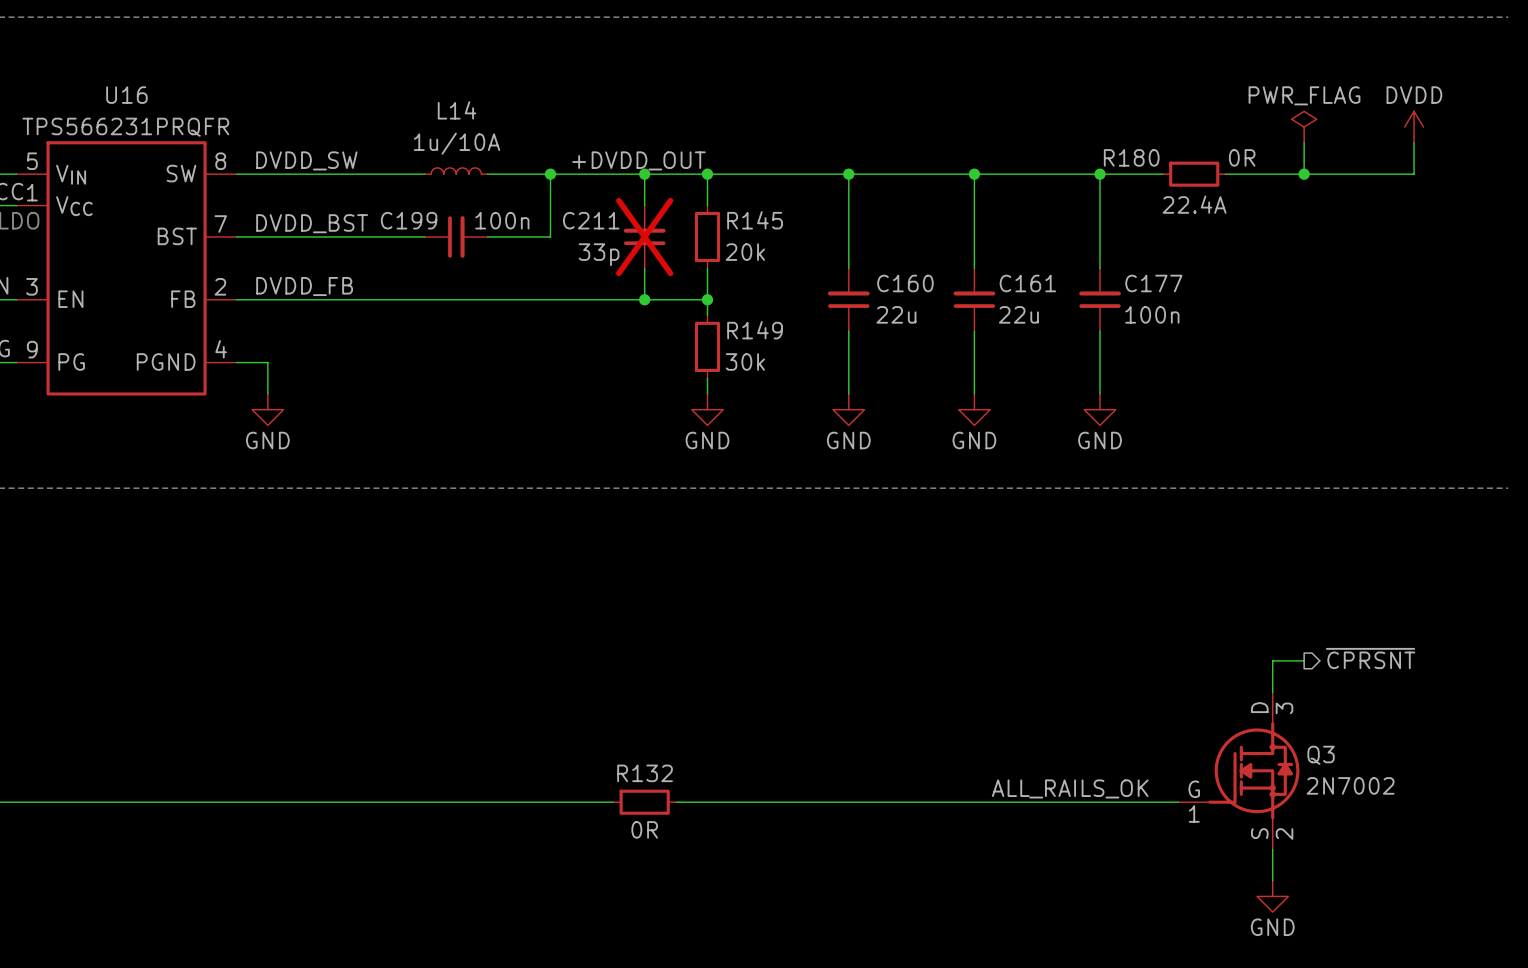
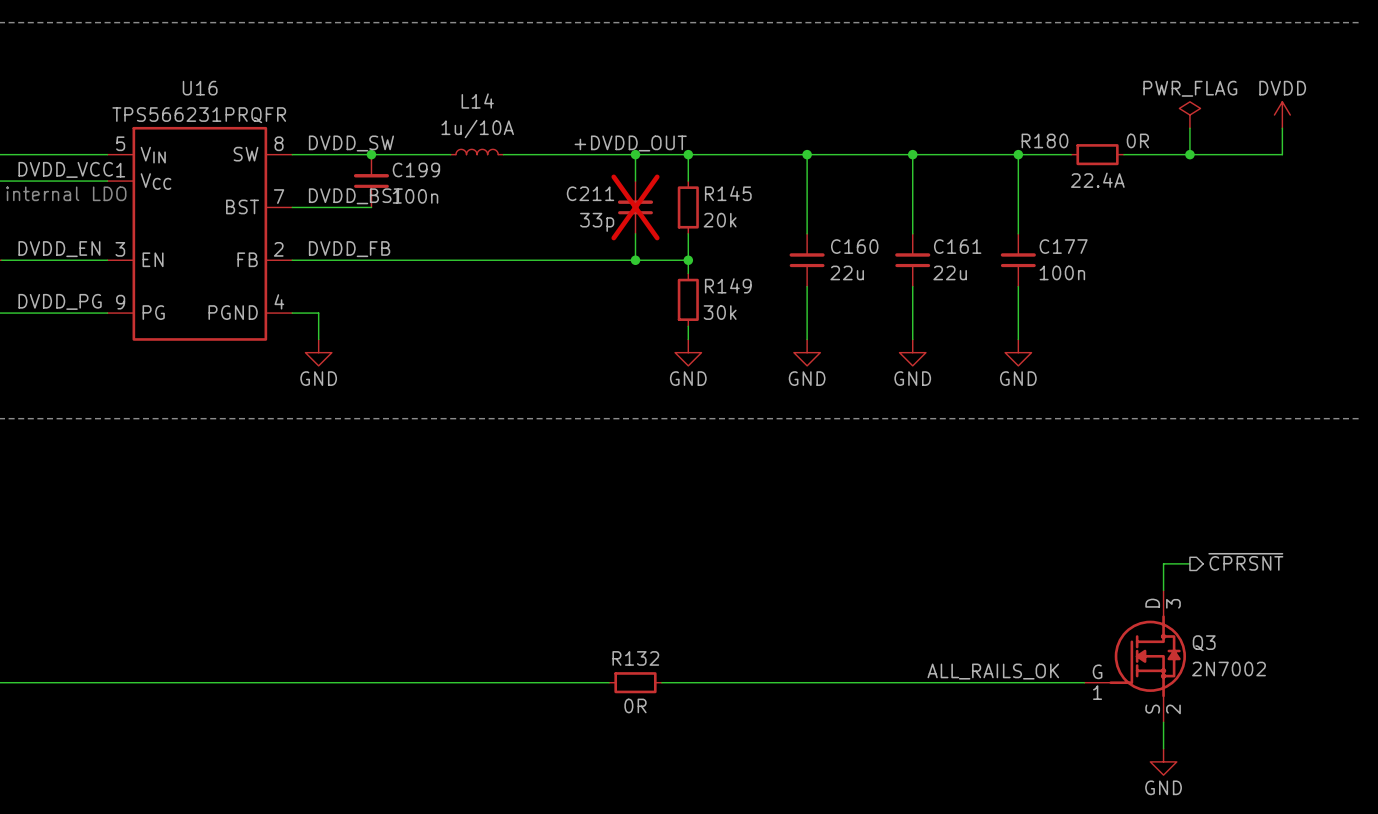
junction: none -> (371, 154)
wire: (550, 174) (550, 236) (487, 236) -> none
junction: (550, 174) -> none
C199 name position: C199 (409, 220) -> C199 (416, 169)
C199 text position: 100n (502, 220) -> 100n (415, 196)
wire: (330, 236) (424, 236) -> none
C199 rotation: 0° (456, 236) -> 90° counterclockwise (371, 180)
C199 position: (456, 236) -> (371, 181)

